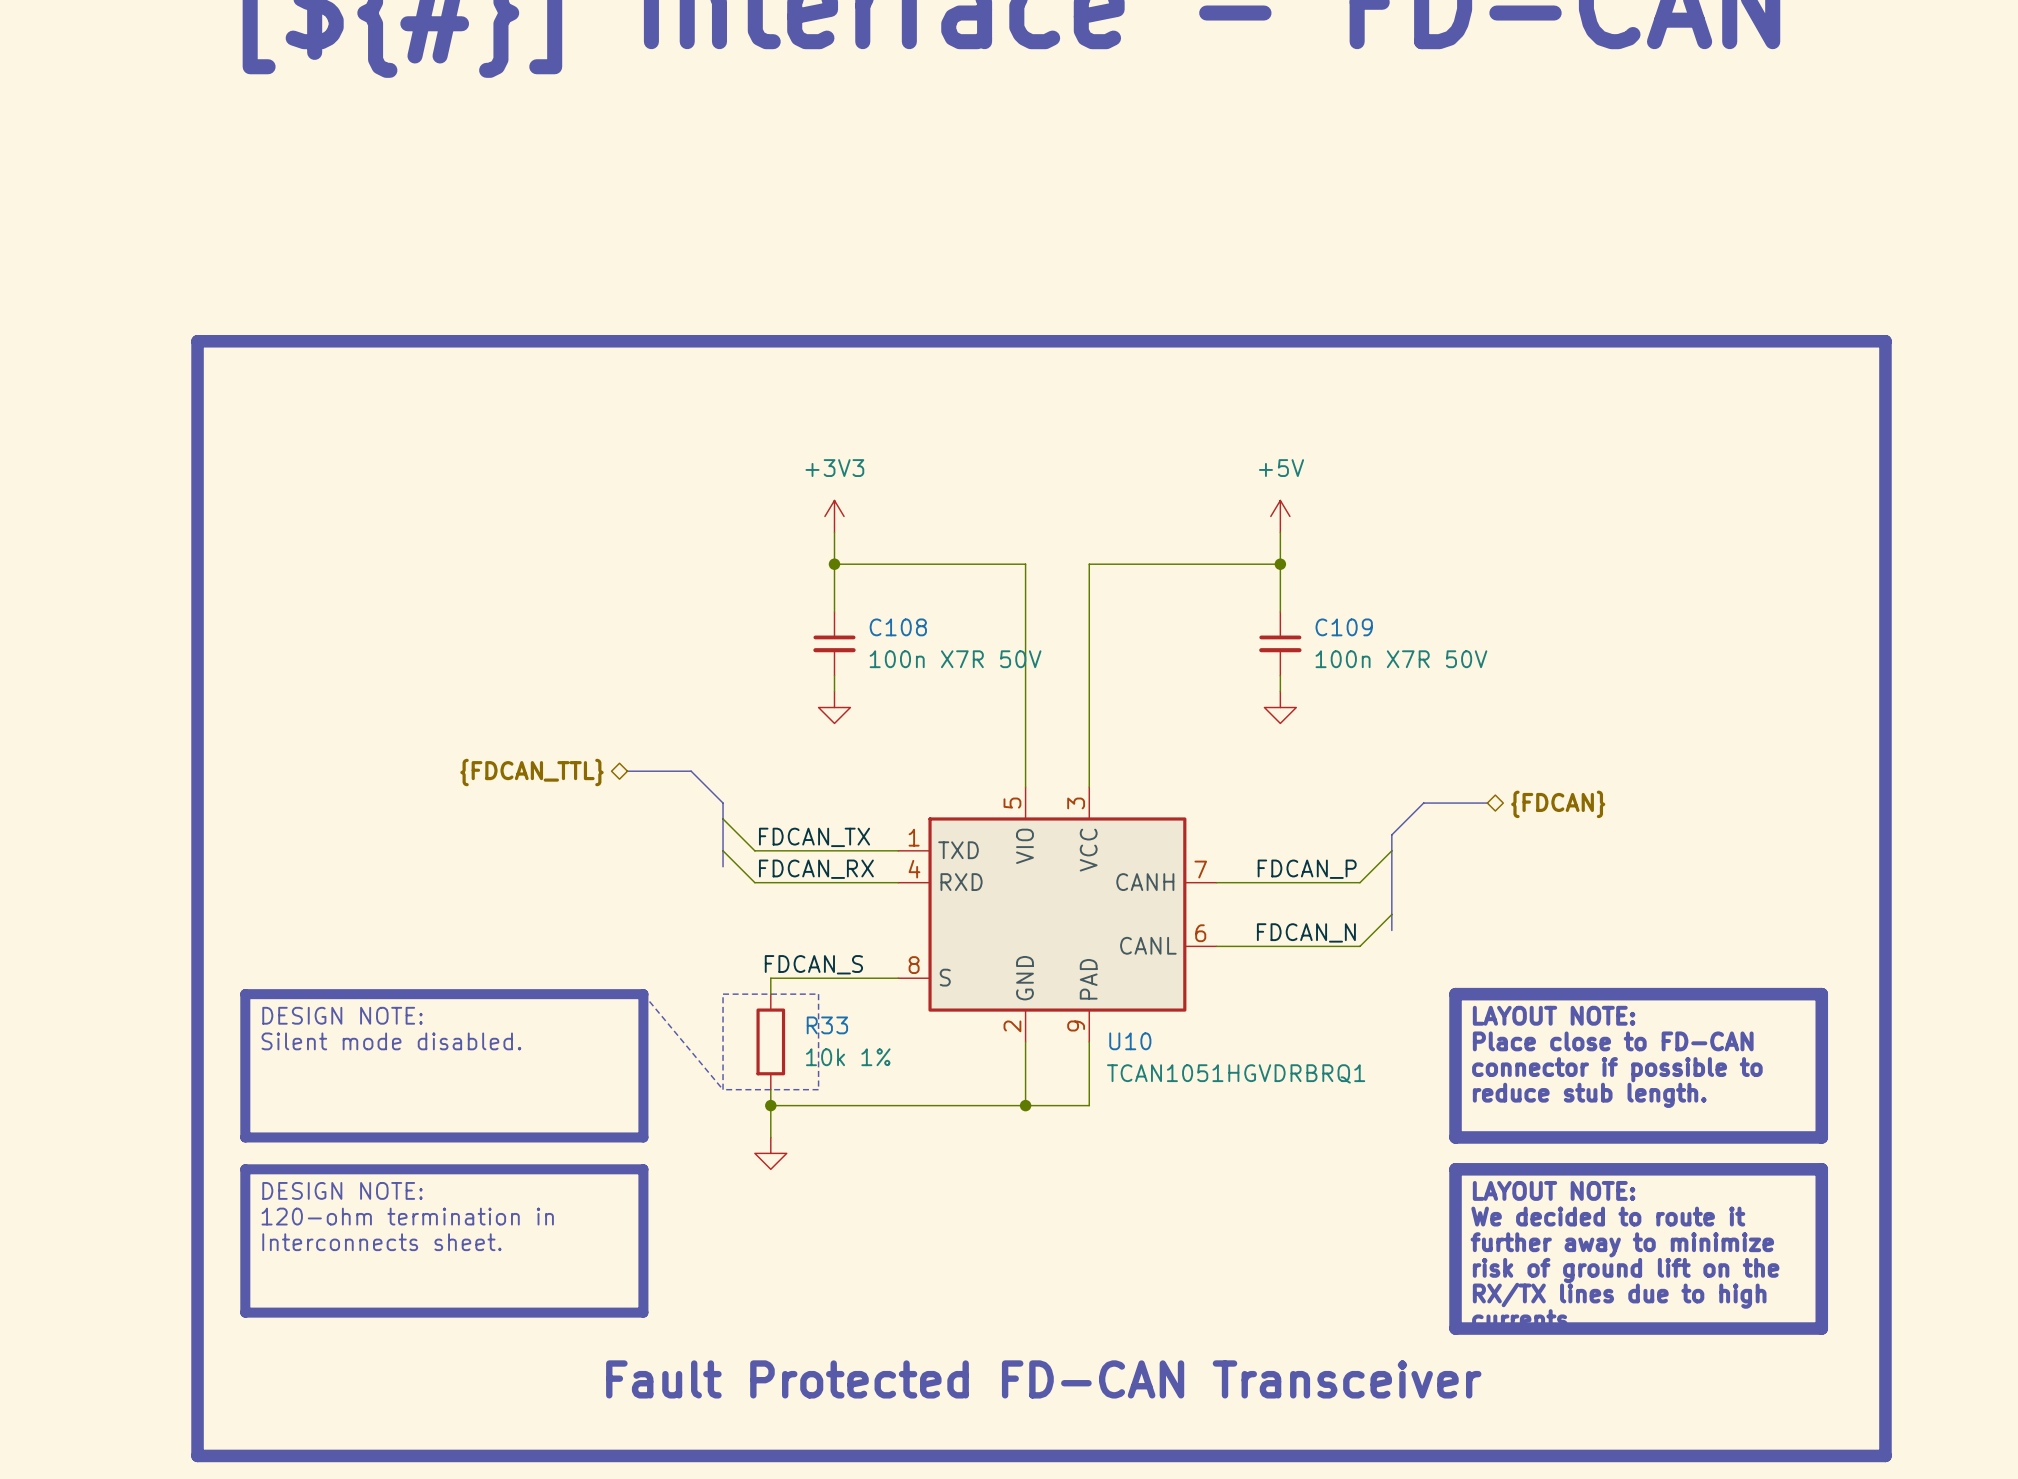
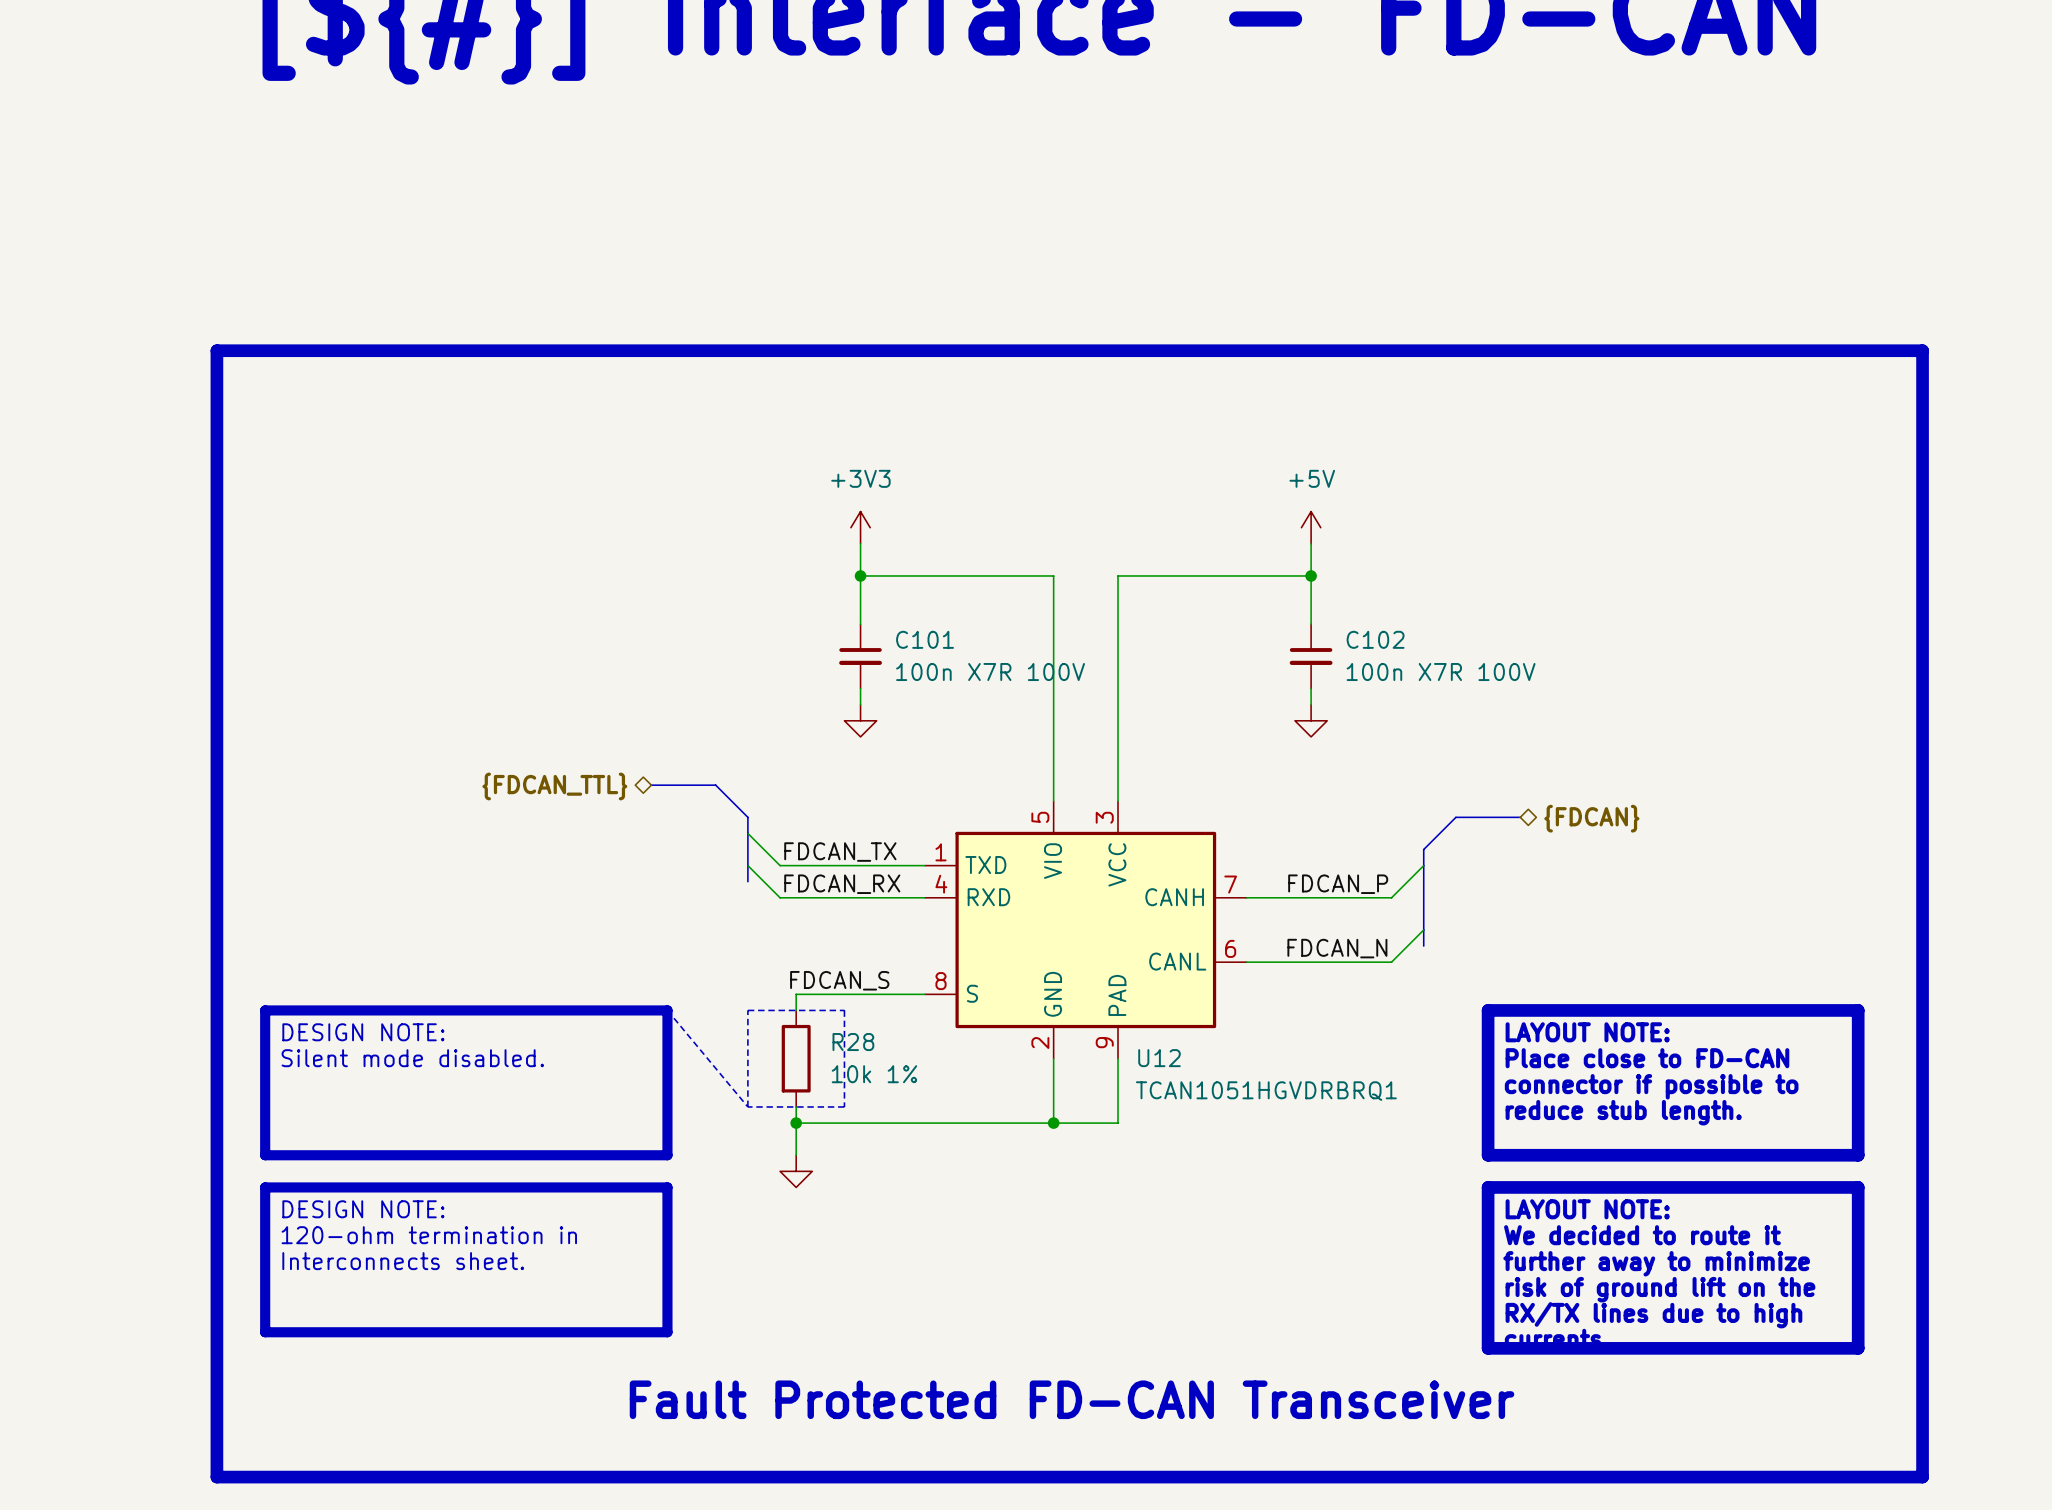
C108 name: C108 (898, 627) -> C101 (925, 639)
C109 name: C109 (1344, 627) -> C102 (1375, 639)
C108 value: 100n X7R 50V (955, 659) -> 100n X7R 100V (990, 672)
C109 value: 100n X7R 50V (1401, 659) -> 100n X7R 100V (1441, 672)
R33 name: R33 (827, 1025) -> R28 (853, 1042)
U10 name: U10 (1130, 1041) -> U12 (1159, 1058)

